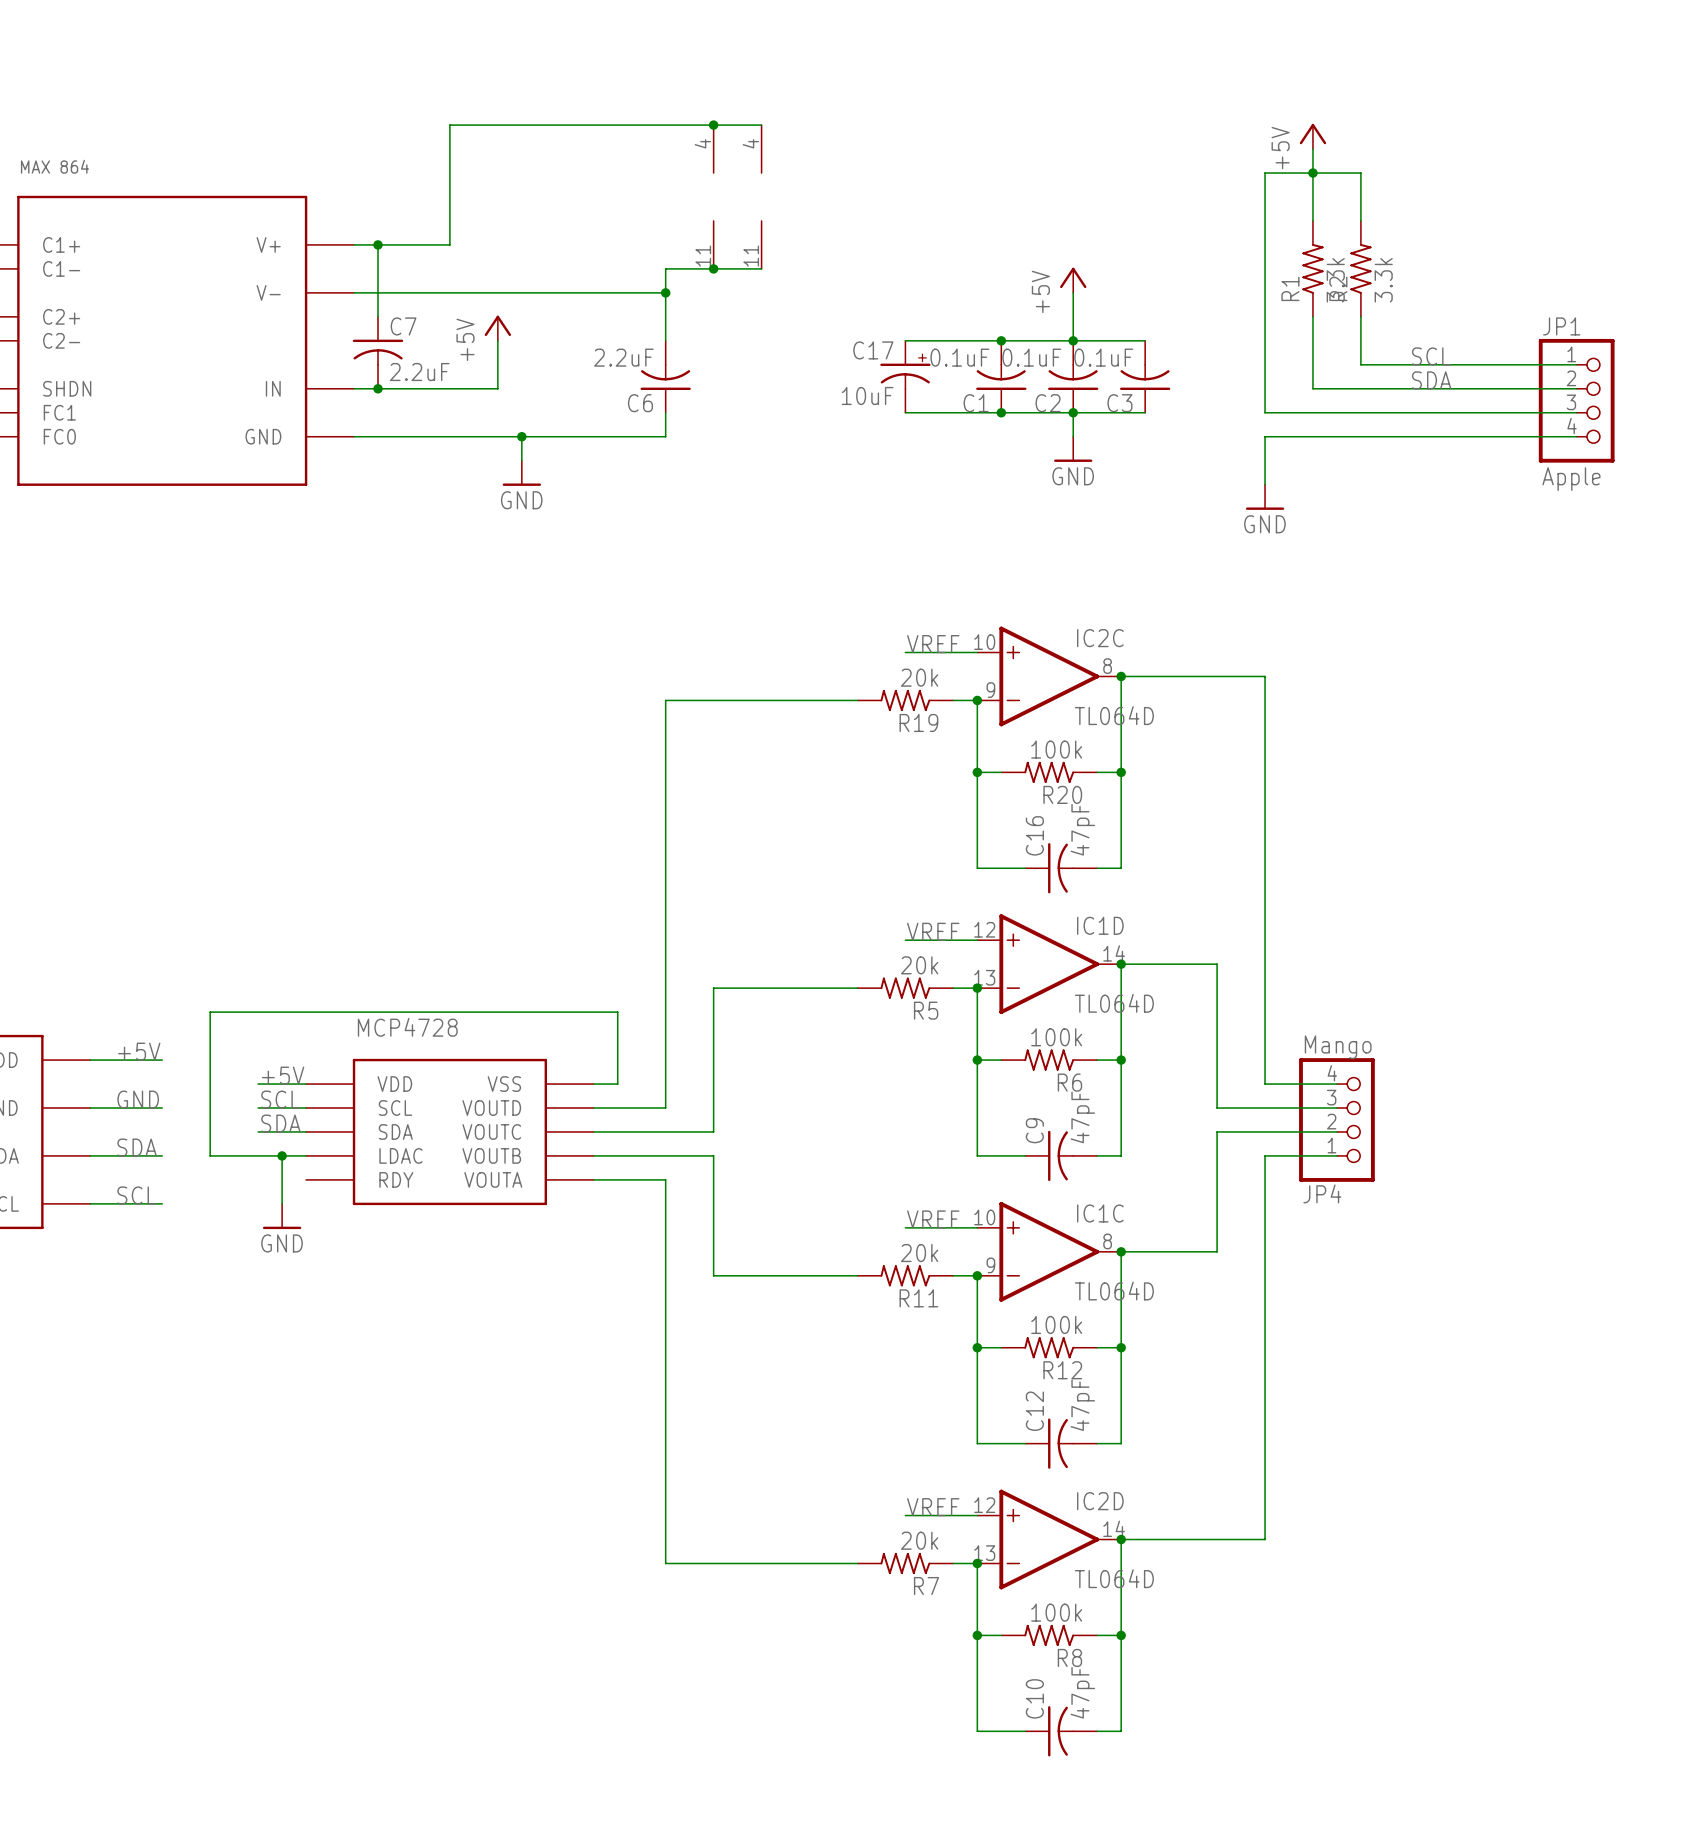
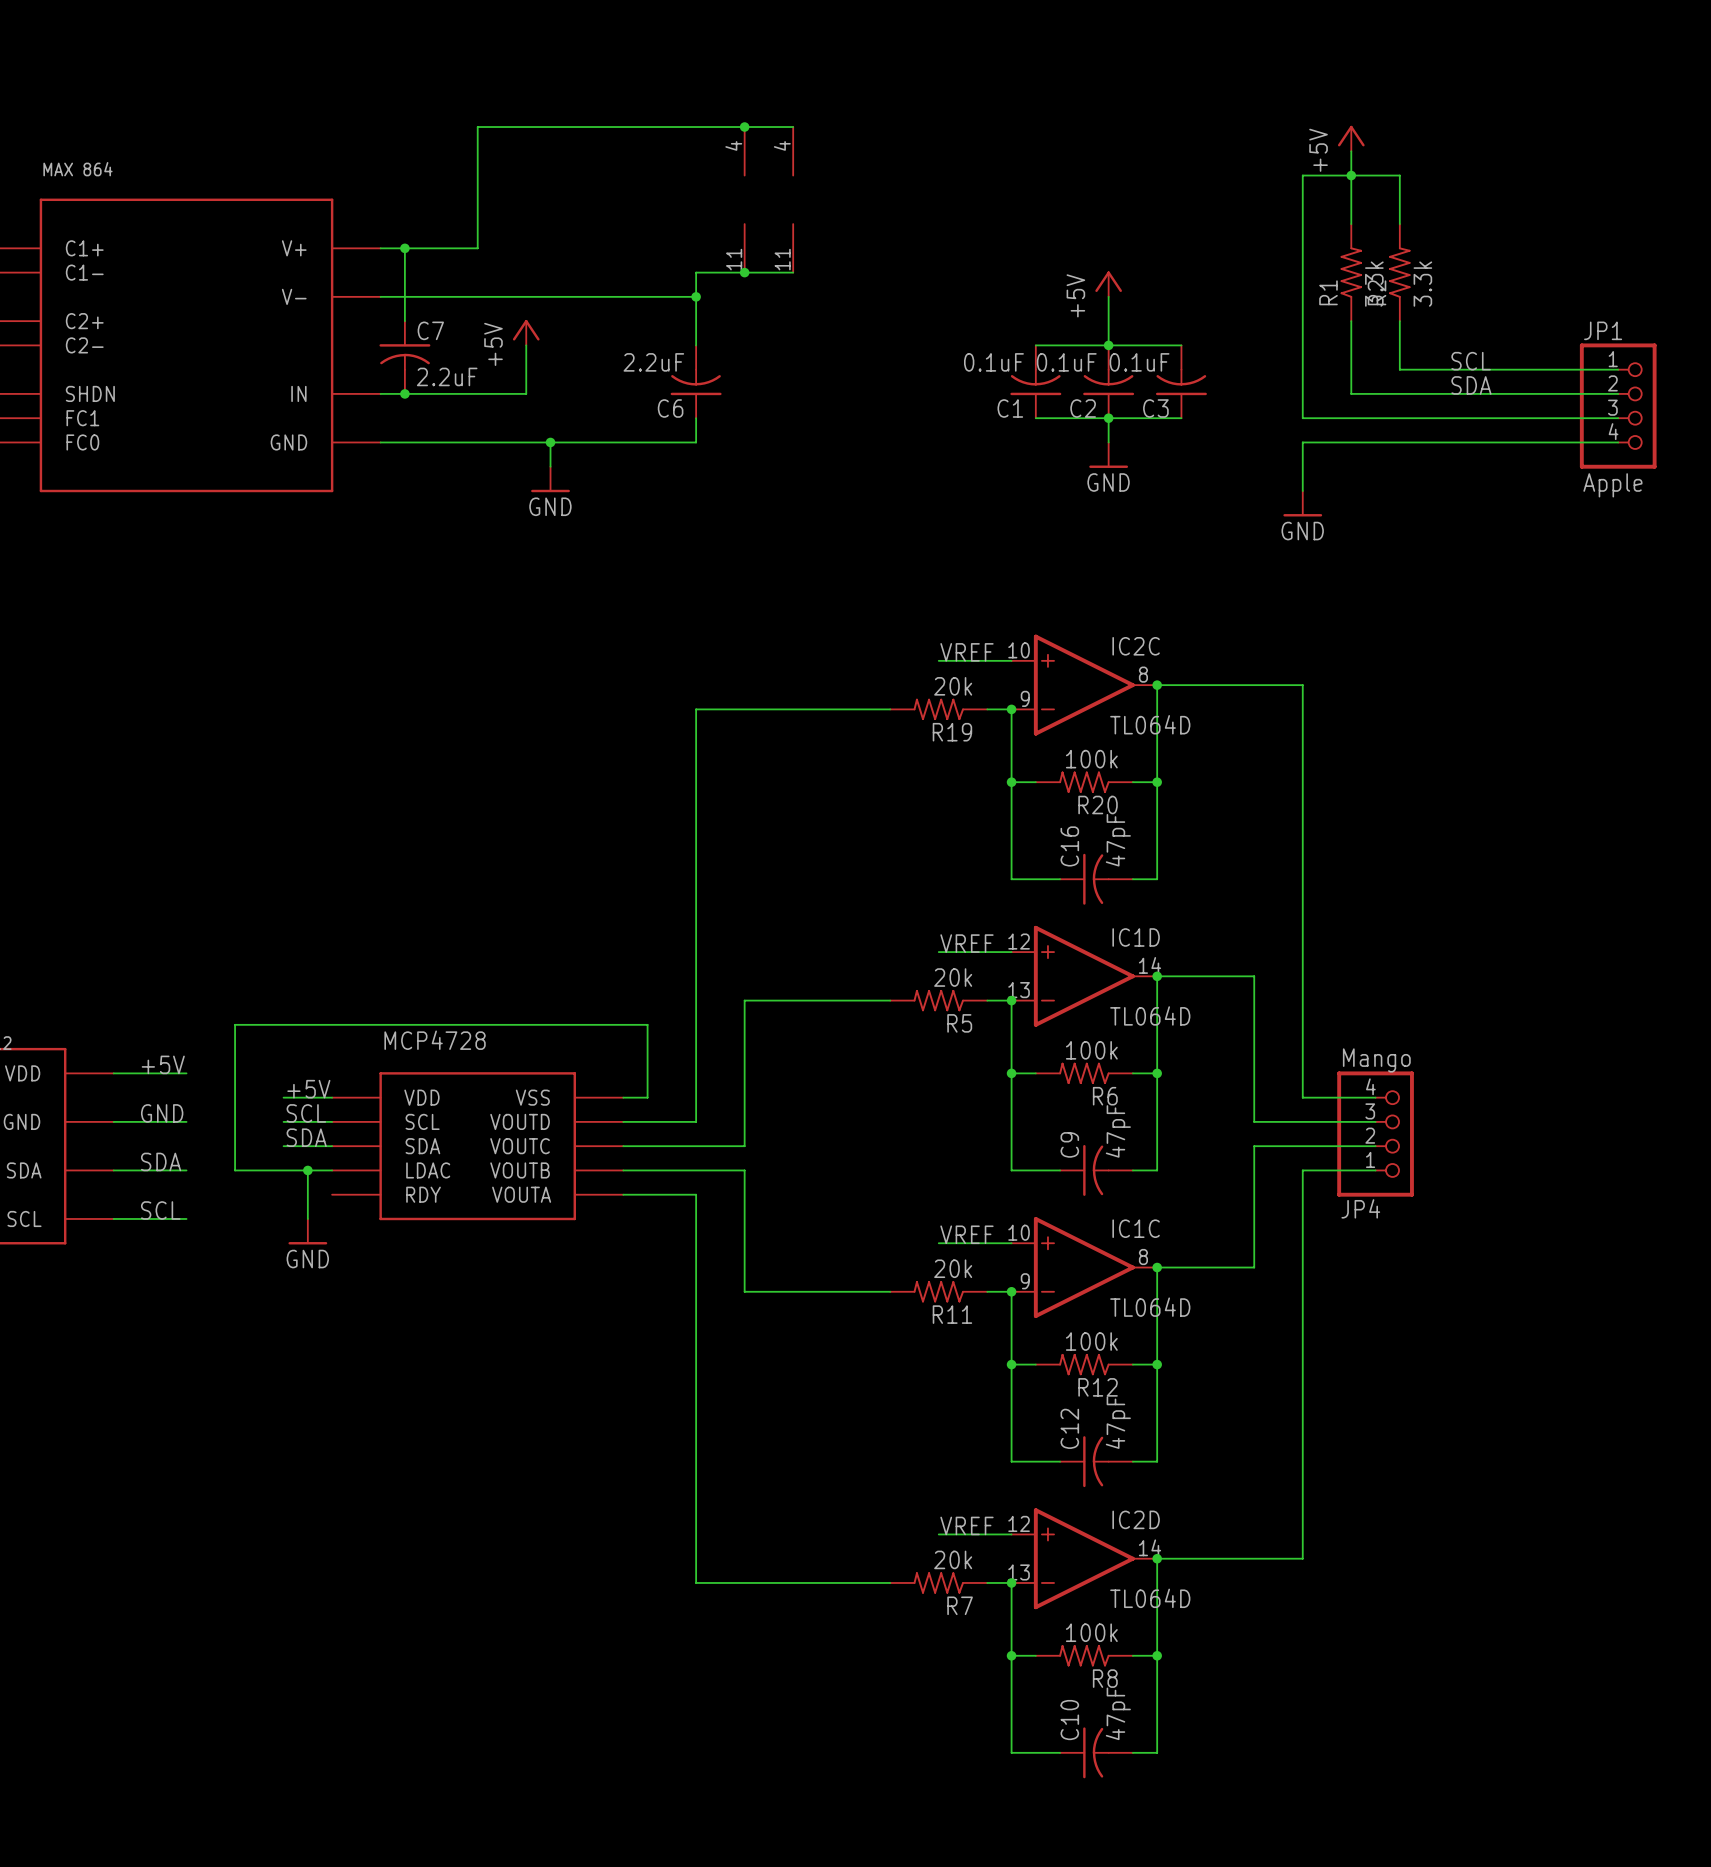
wire: (905, 340) (1001, 340) -> none
junction: (1001, 340) -> none
C17: 10uF (905, 376) -> none
wire: (905, 412) (1001, 412) -> none
junction: (1001, 412) -> none

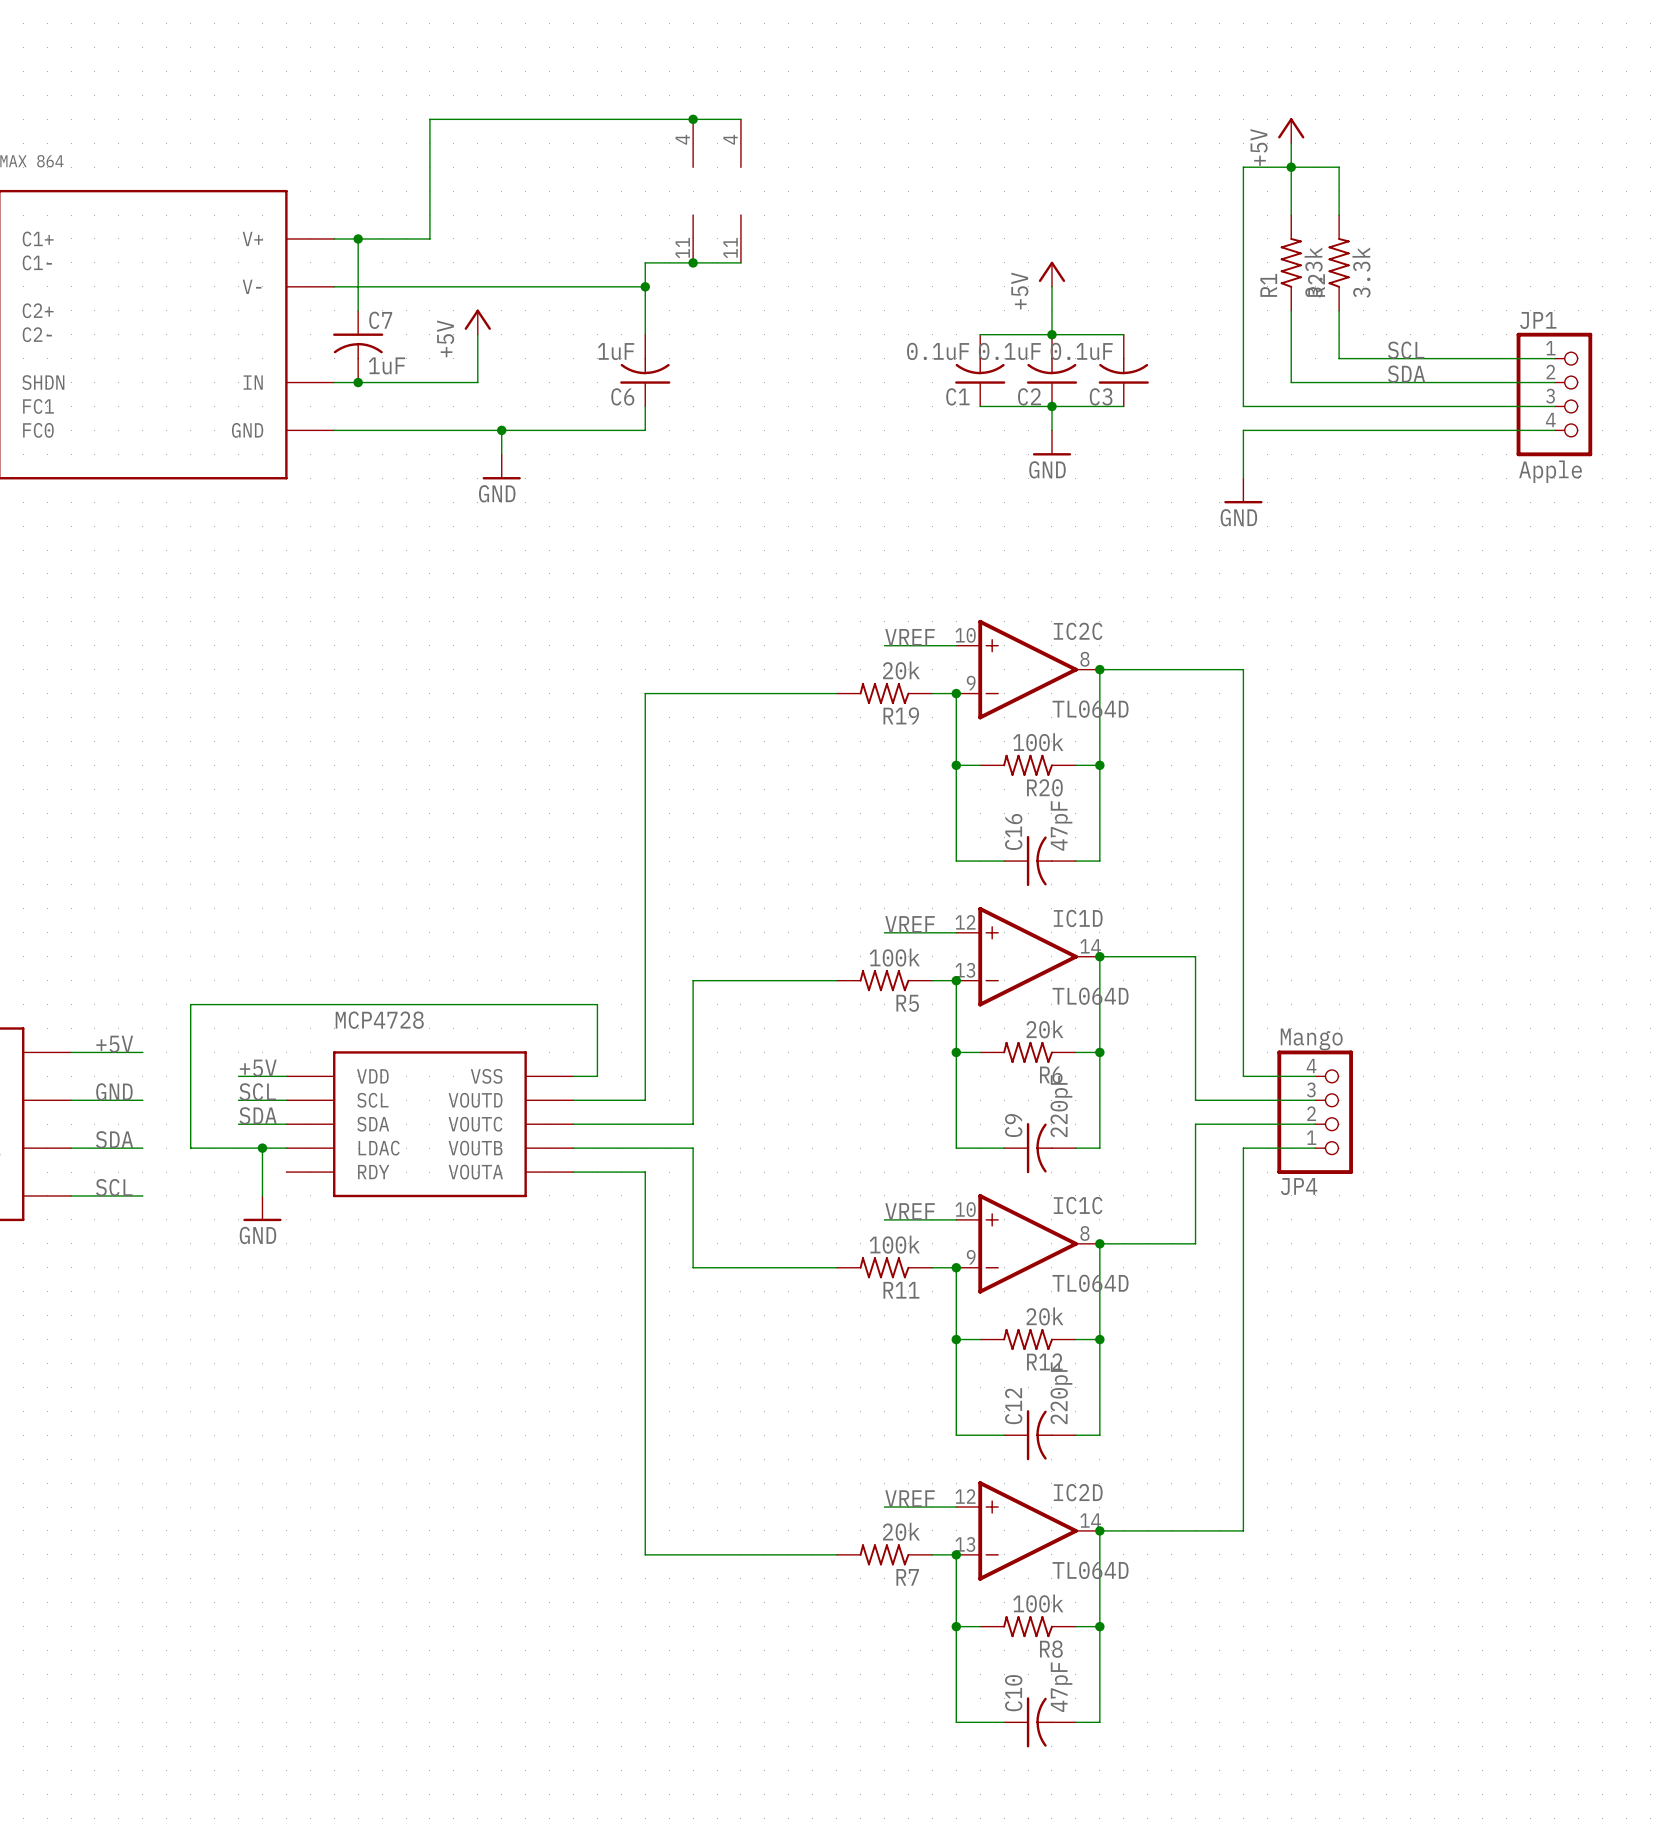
C6 value: 2.2uF (653, 362) -> 1uF (616, 351)
C7 value: 2.2uF (447, 376) -> 1uF (386, 365)
R5 value: 20k (953, 977) -> 100k (894, 957)
R6 value: 100k (1091, 1050) -> 20k (1044, 1029)
C9 value: 47pF (1118, 1131) -> 220pF (1061, 1106)
R11 value: 20k (953, 1268) -> 100k (894, 1244)
R12 value: 100k (1091, 1341) -> 20k (1044, 1316)
C12 value: 47pF (1118, 1422) -> 220pF (1061, 1393)

